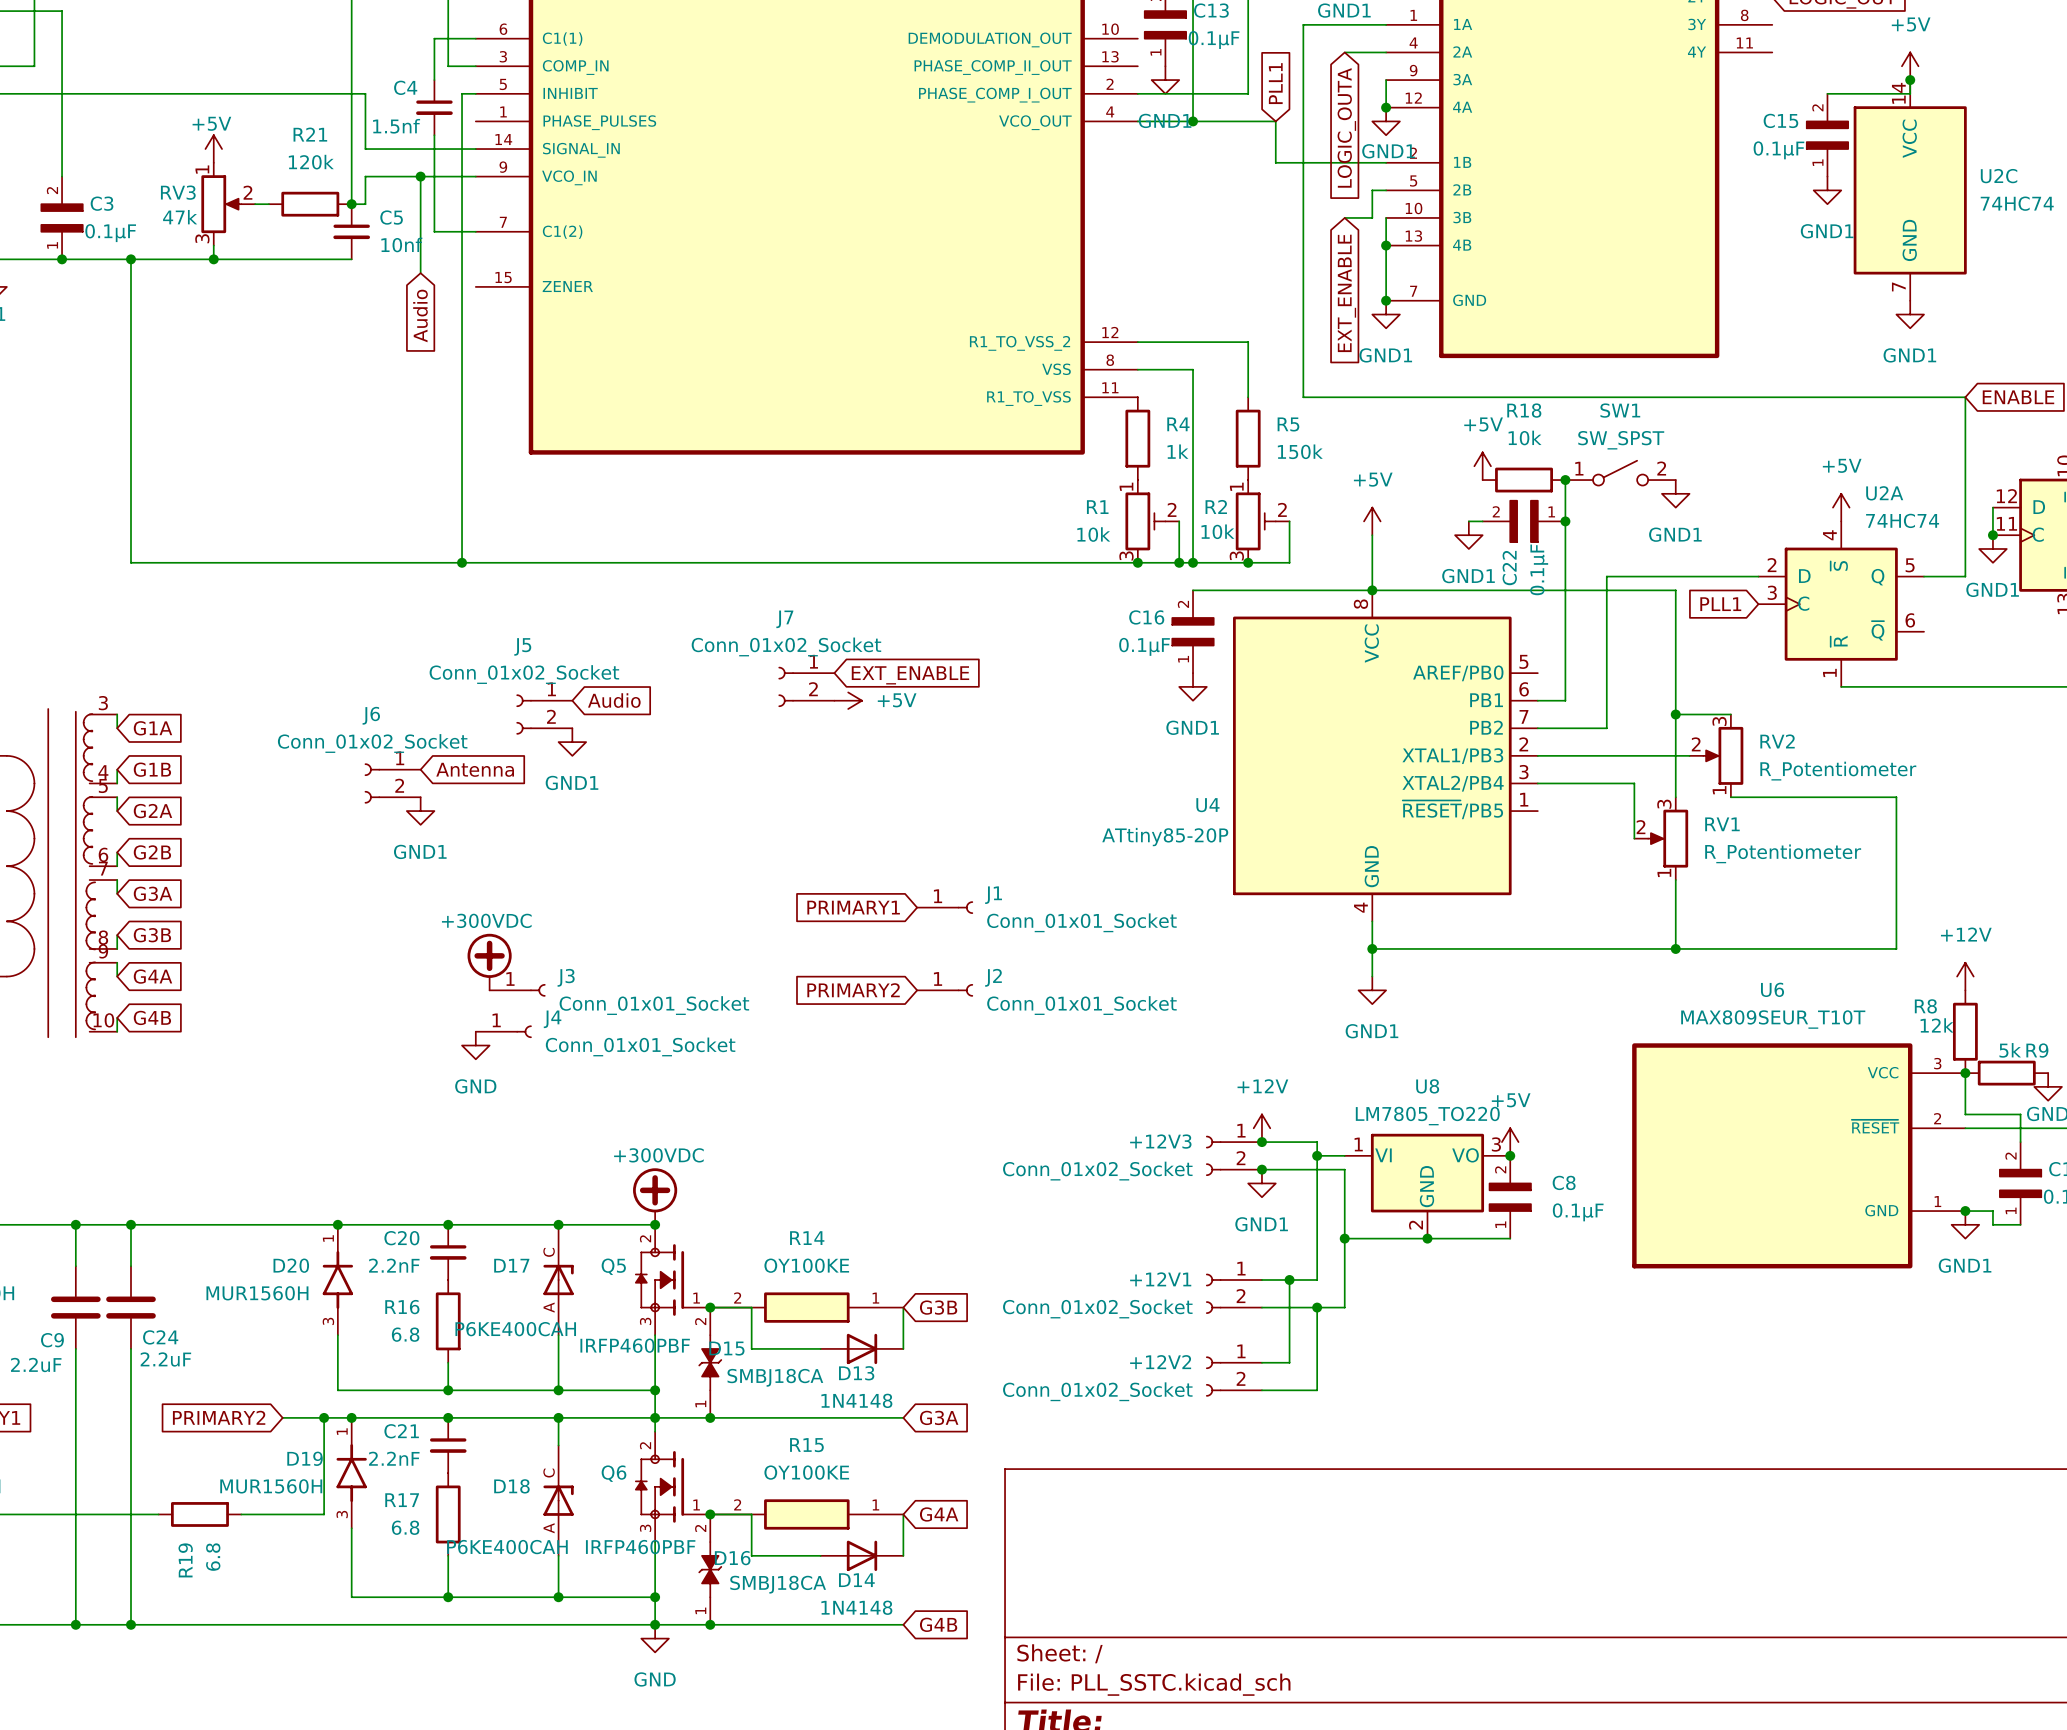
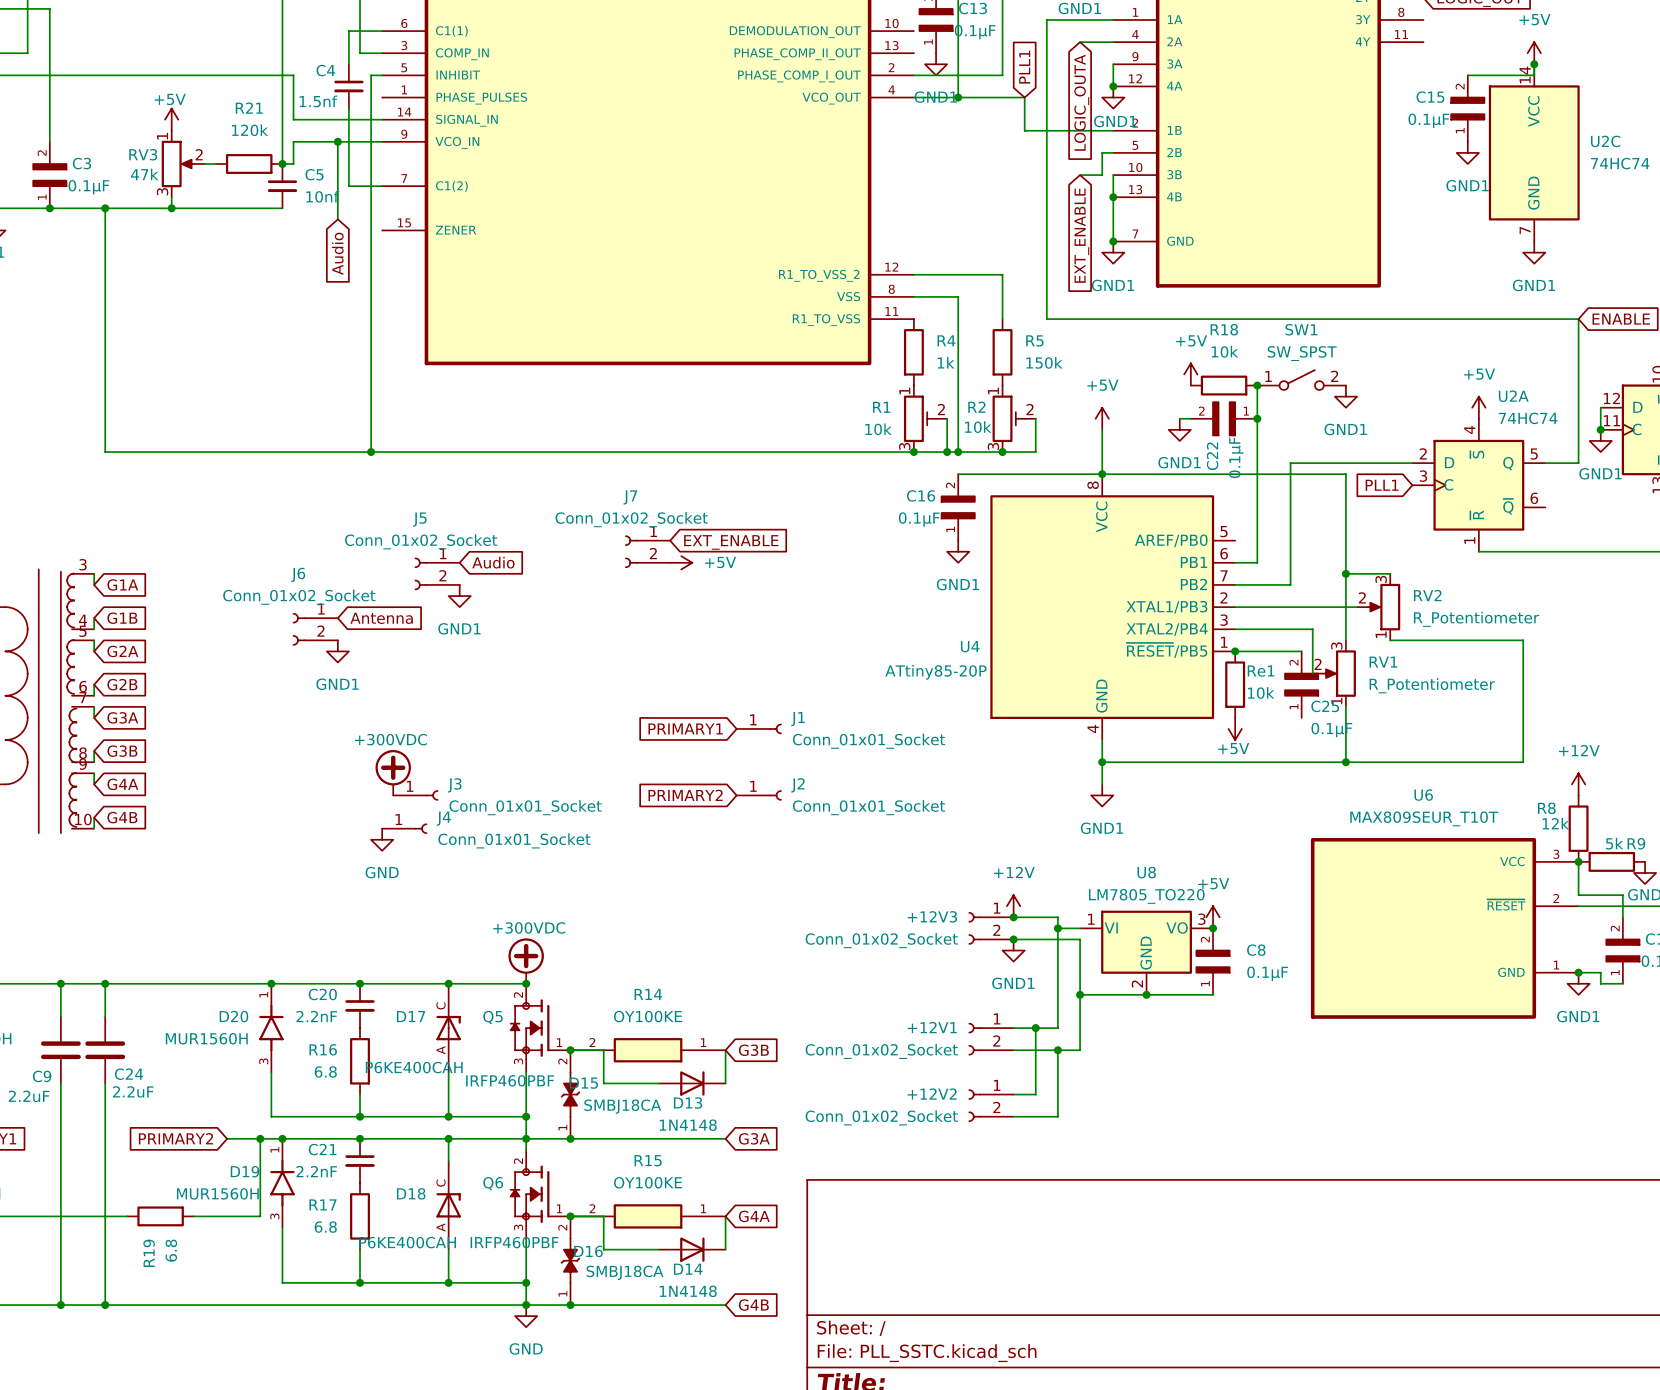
wire: none -> (1235, 651) (1301, 651)
junction: none -> (1235, 651)
Re1: none -> 10k (1235, 684)
C25: none -> 0.1µF (1301, 684)
power symbol: none -> +5V (1235, 728)

